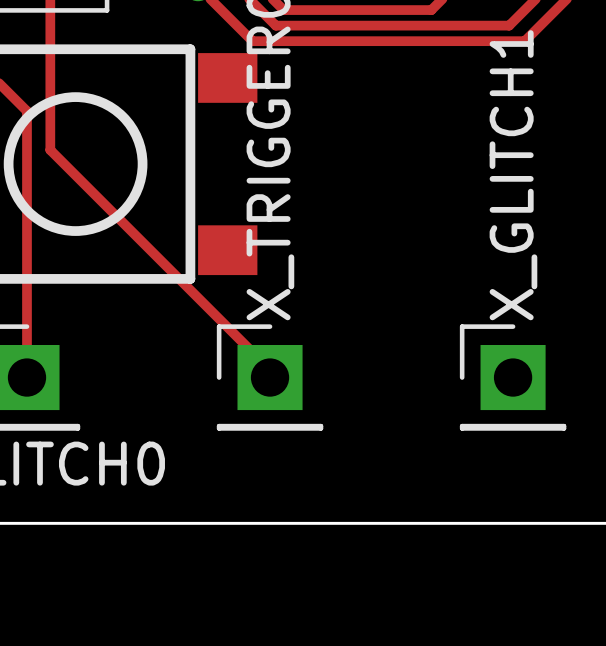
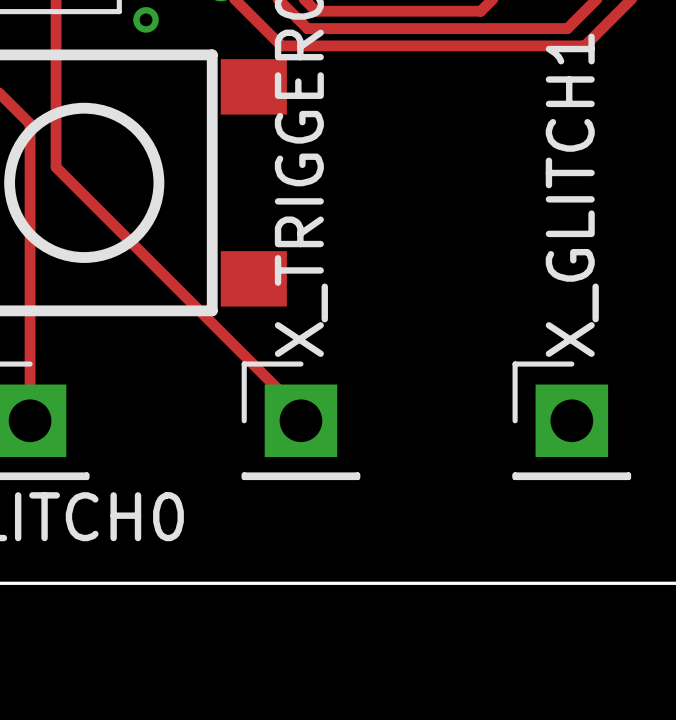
via: none -> (146, 19)

